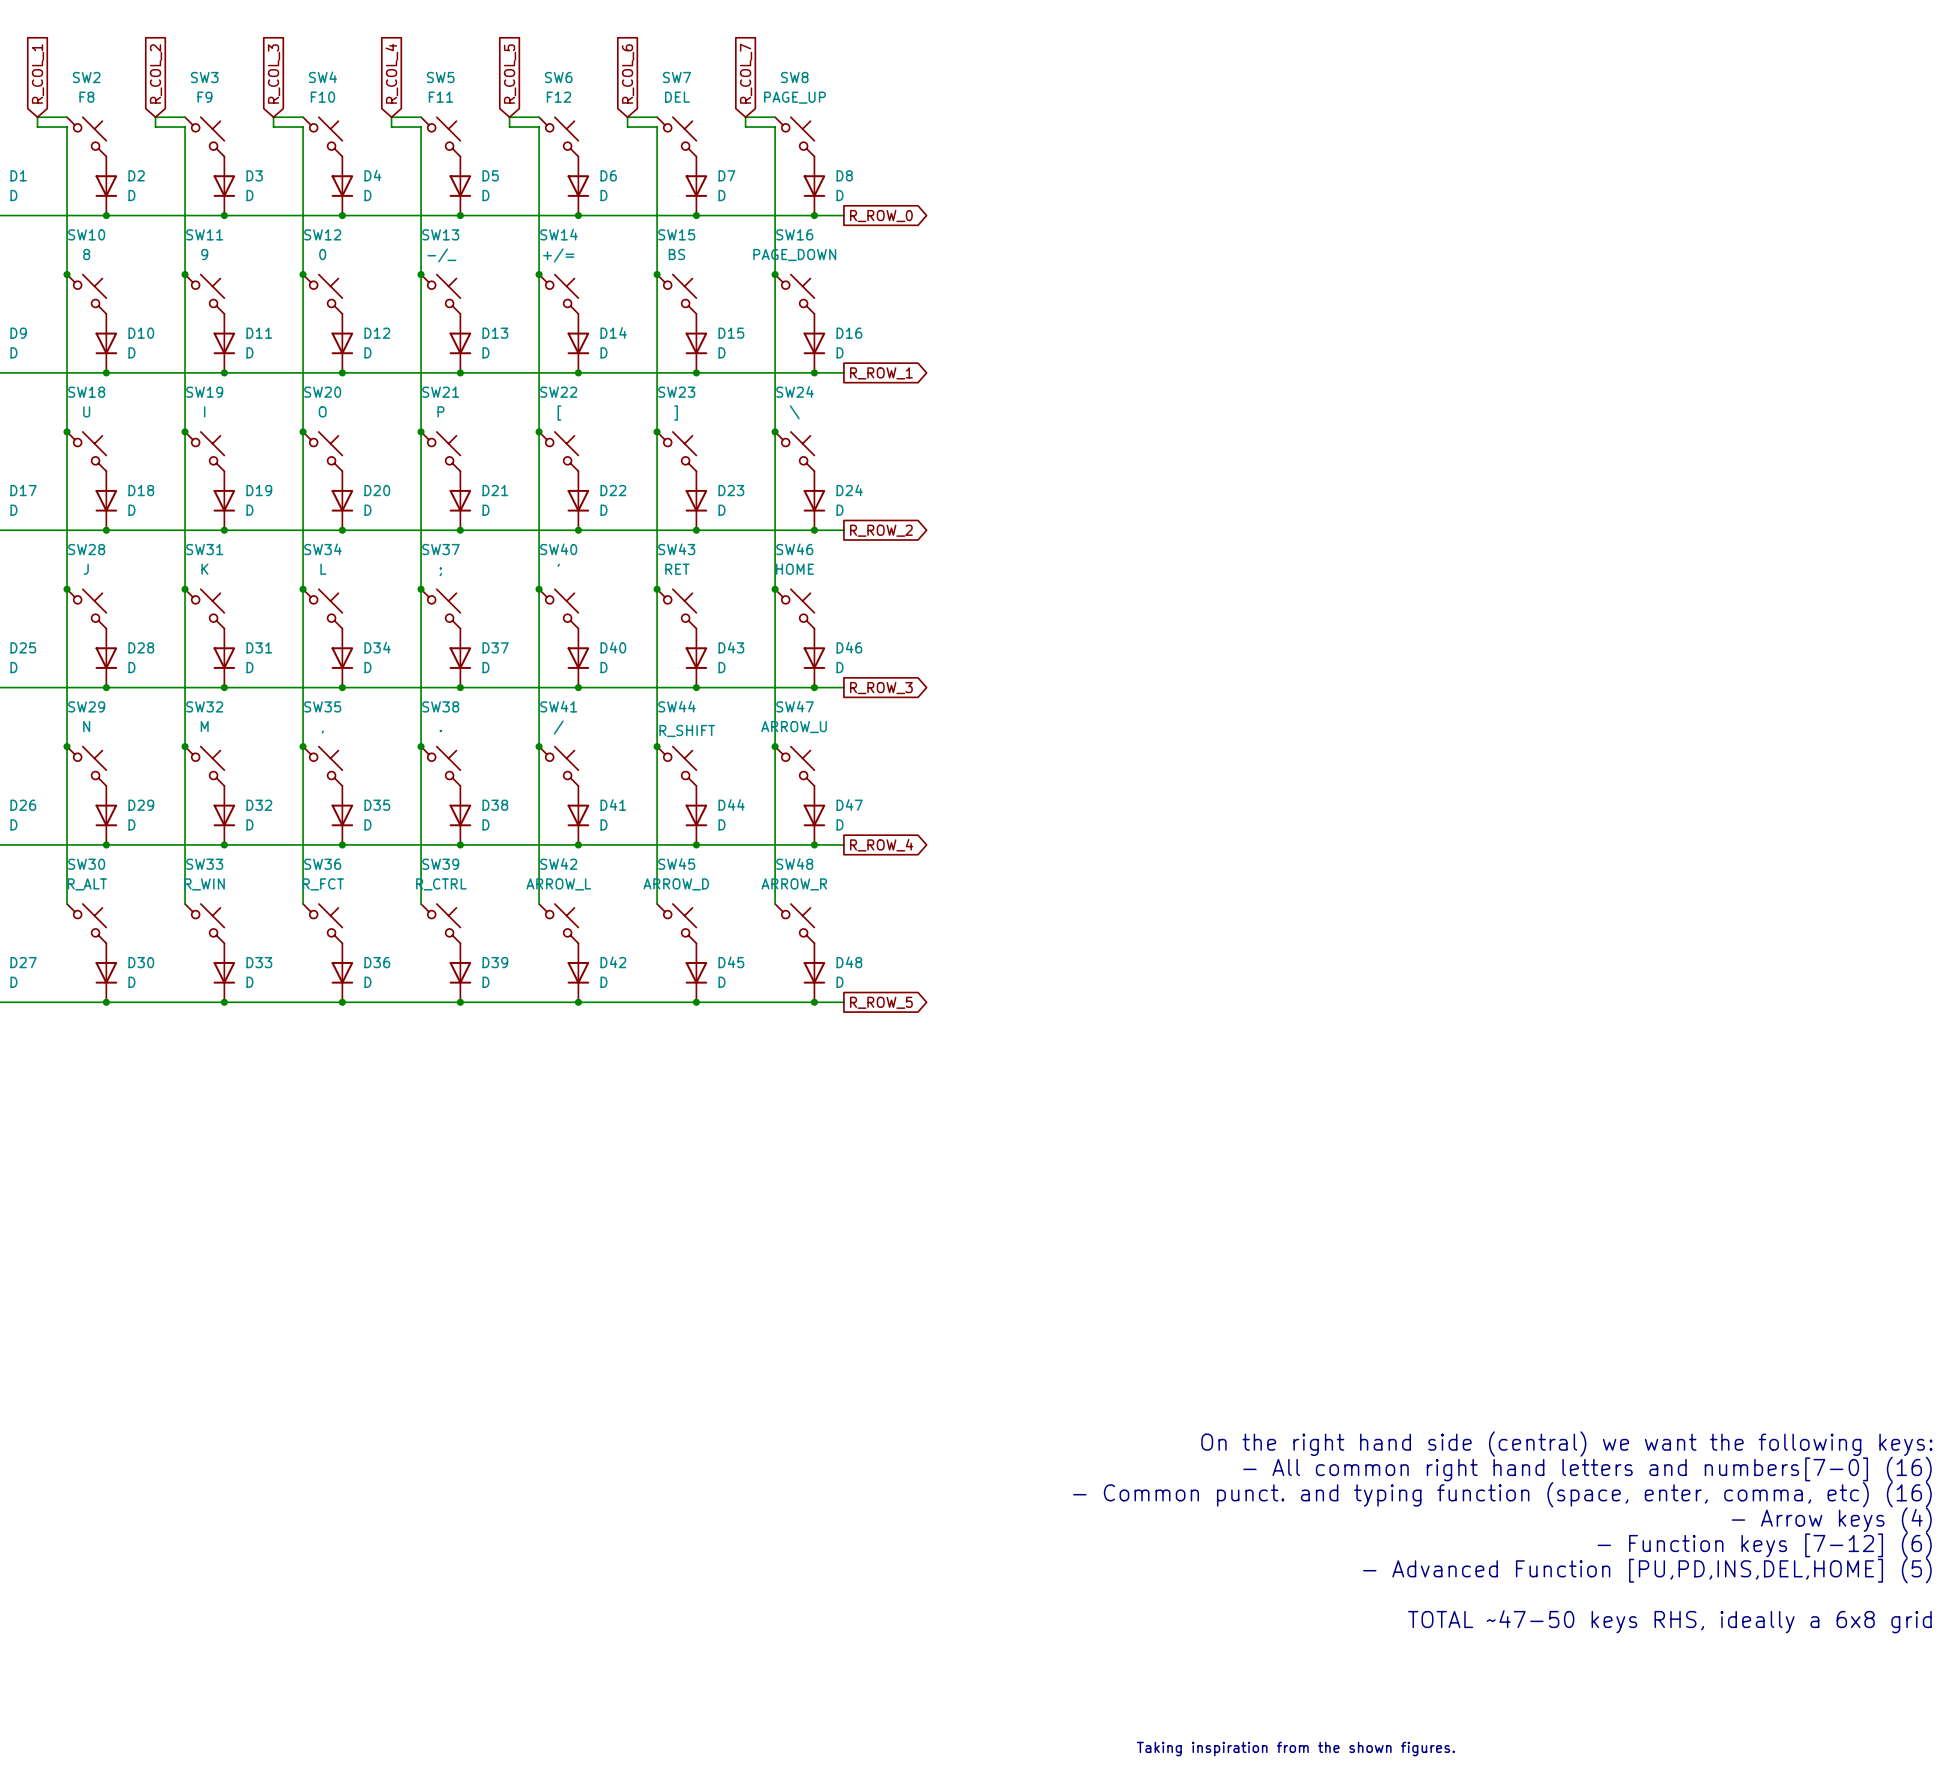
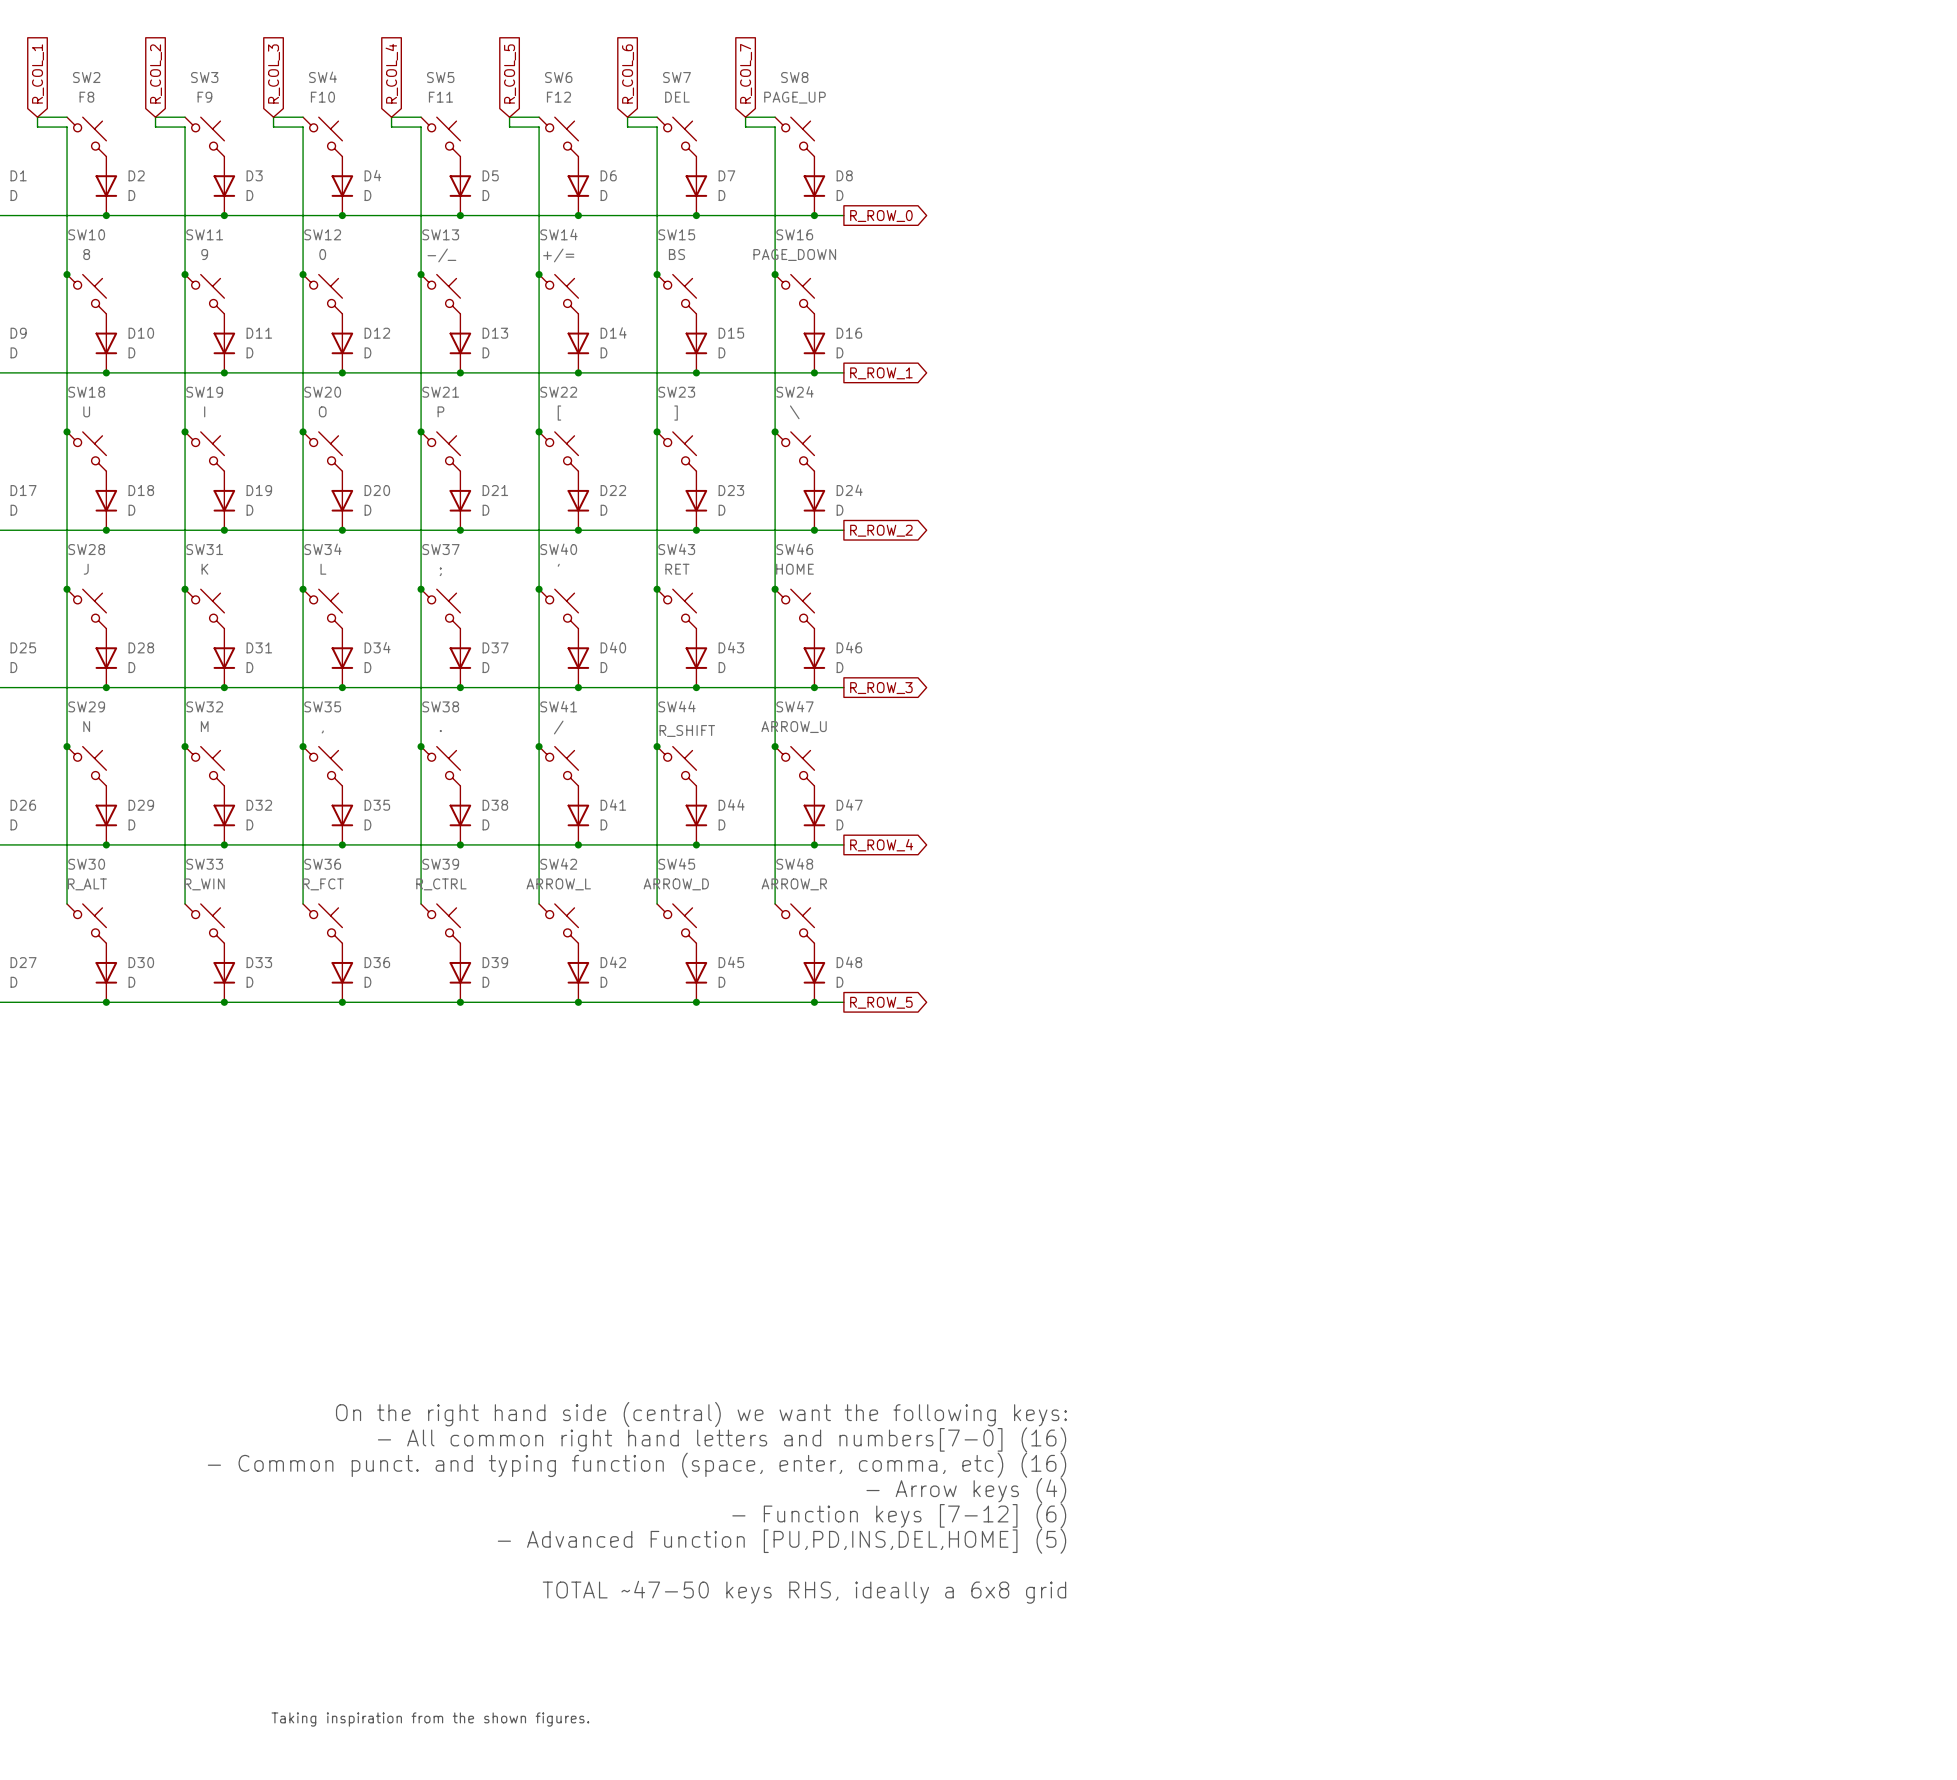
text: none -> On the right hand side (central) we want the following keys: (701, 1414)
text: none -> - All common right hand letters and numbers[7-0] (16) (722, 1439)
text: On the right hand side (central) we want the following keys: (1566, 1444) -> none
text: none -> - Common punct. and typing function (space, enter, comma, etc) (16) (637, 1465)
text: - All common right hand letters and numbers[7-0] (16) (1587, 1469) -> none
text: none -> - Arrow keys (4) (966, 1490)
text: - Common punct. and typing function (space, enter, comma, etc) (16) (1502, 1494) -> none
text: none -> - Function keys [7-12] (6) (899, 1515)
text: - Arrow keys (4) (1831, 1520) -> none
text: none -> - Advanced Function [PU,PD,INS,DEL,HOME] (5) (781, 1541)
text: - Function keys [7-12] (6) (1764, 1545) -> none
text: - Advanced Function [PU,PD,INS,DEL,HOME] (5) (1647, 1570) -> none
text: none -> TOTAL ~47-50 keys RHS, ideally a 6x8 grid (804, 1592)
text: TOTAL ~47-50 keys RHS, ideally a 6x8 grid (1669, 1621) -> none
text: none -> Taking inspiration from the shown figures. (430, 1719)
text: Taking inspiration from the shown figures. (1295, 1749) -> none

